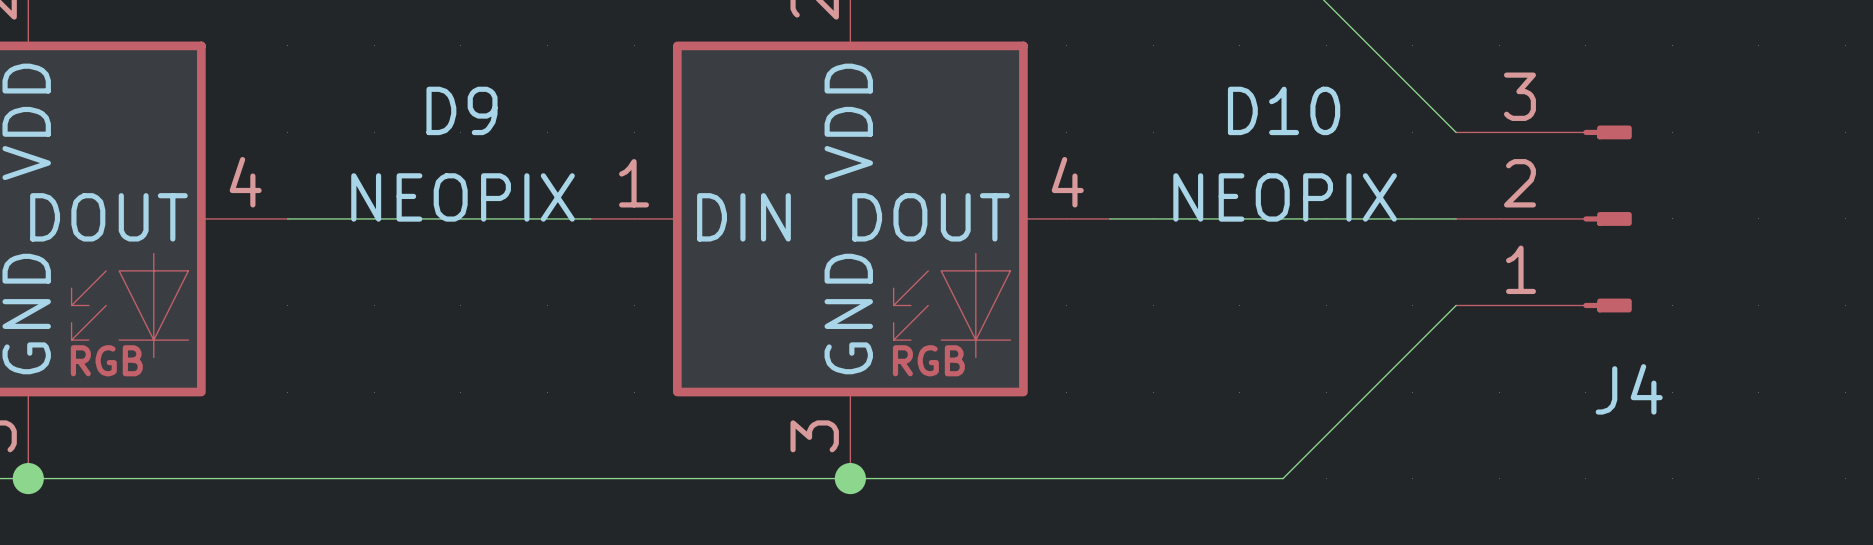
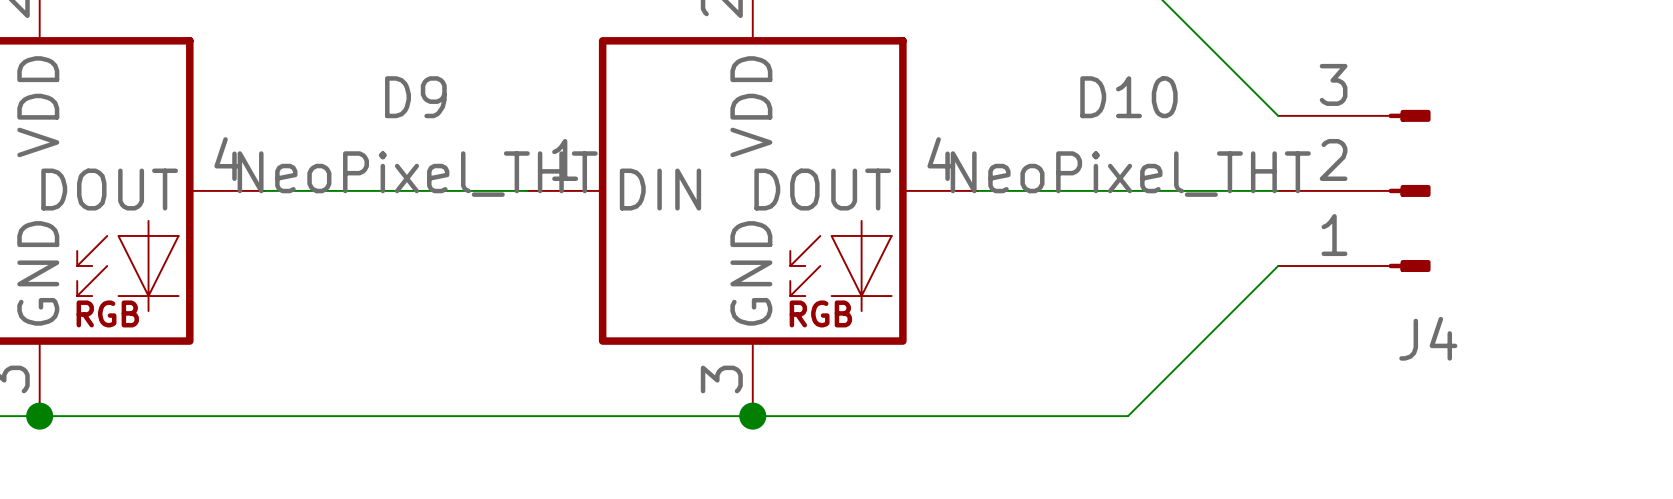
D9 value: NEOPIX (463, 197) -> NeoPixel_THT (417, 174)
D10 value: NEOPIX (1285, 197) -> NeoPixel_THT (1130, 174)

